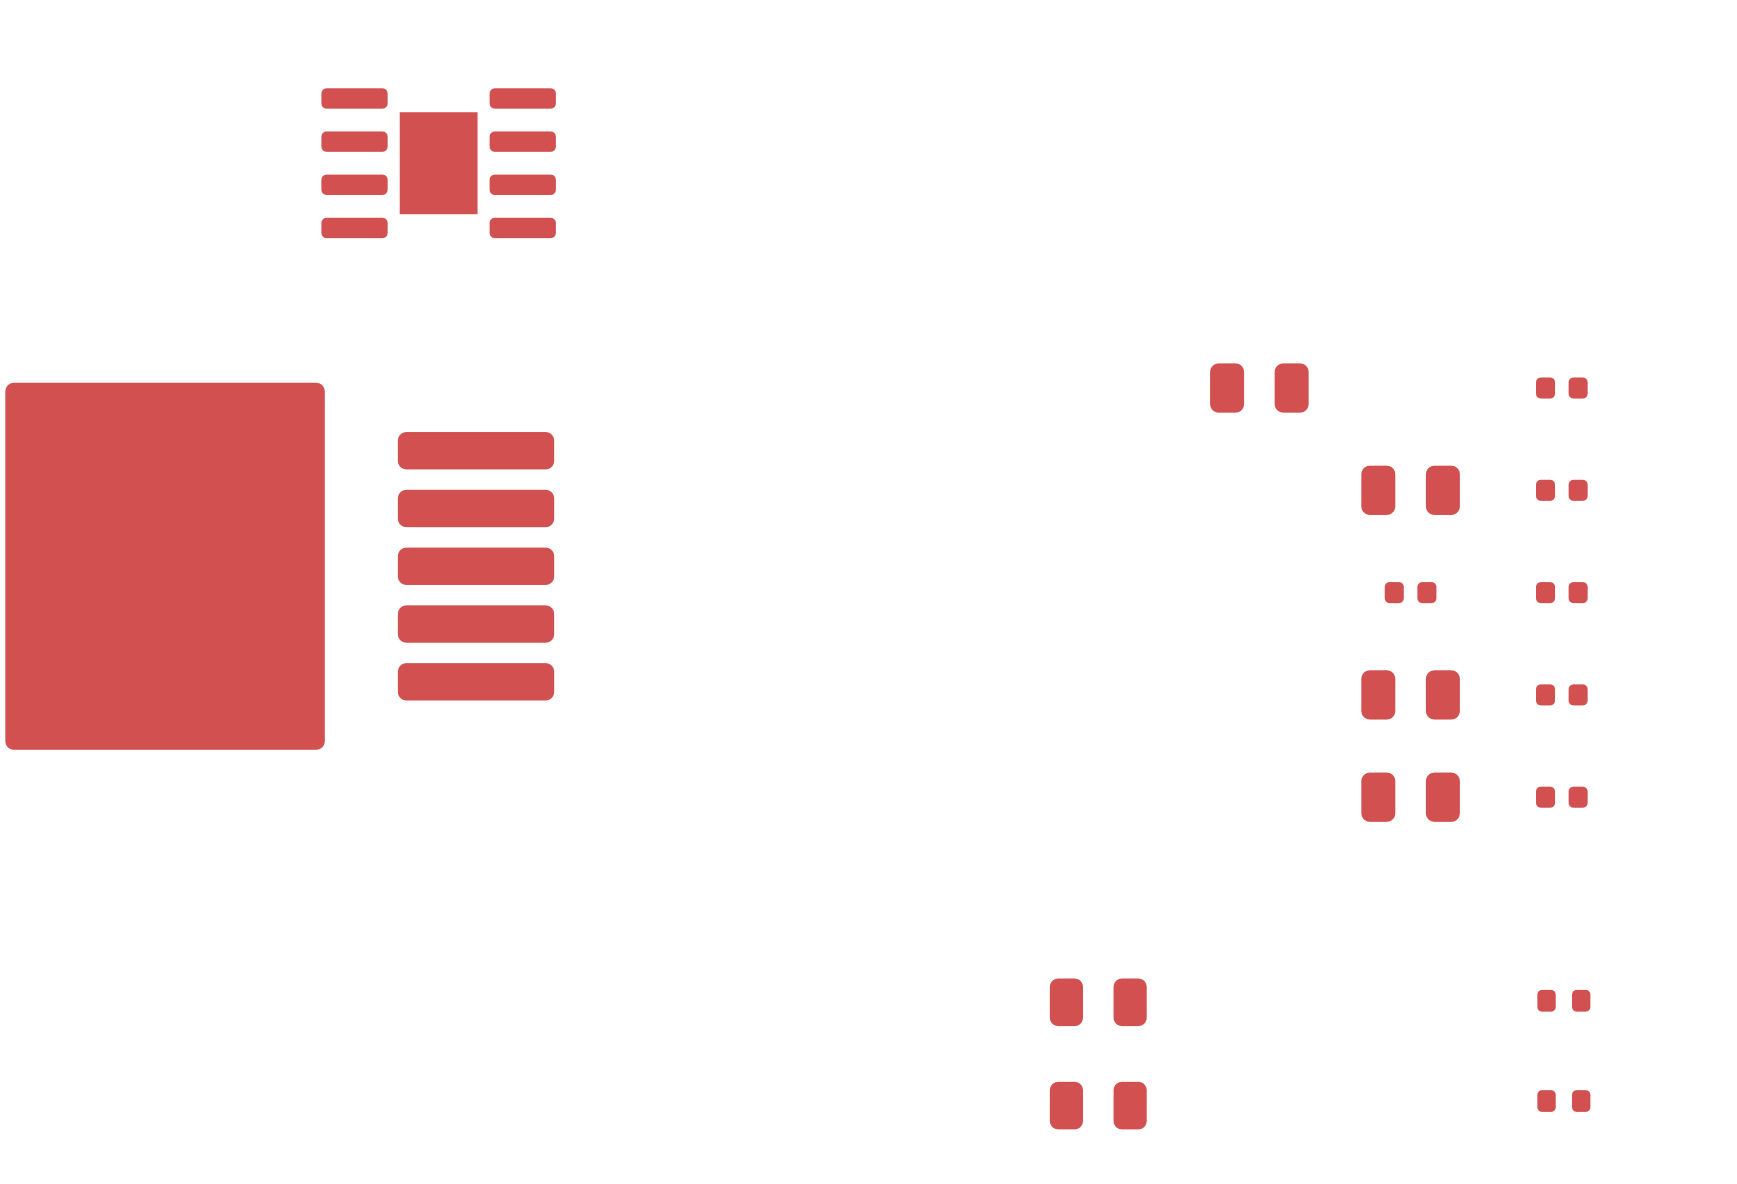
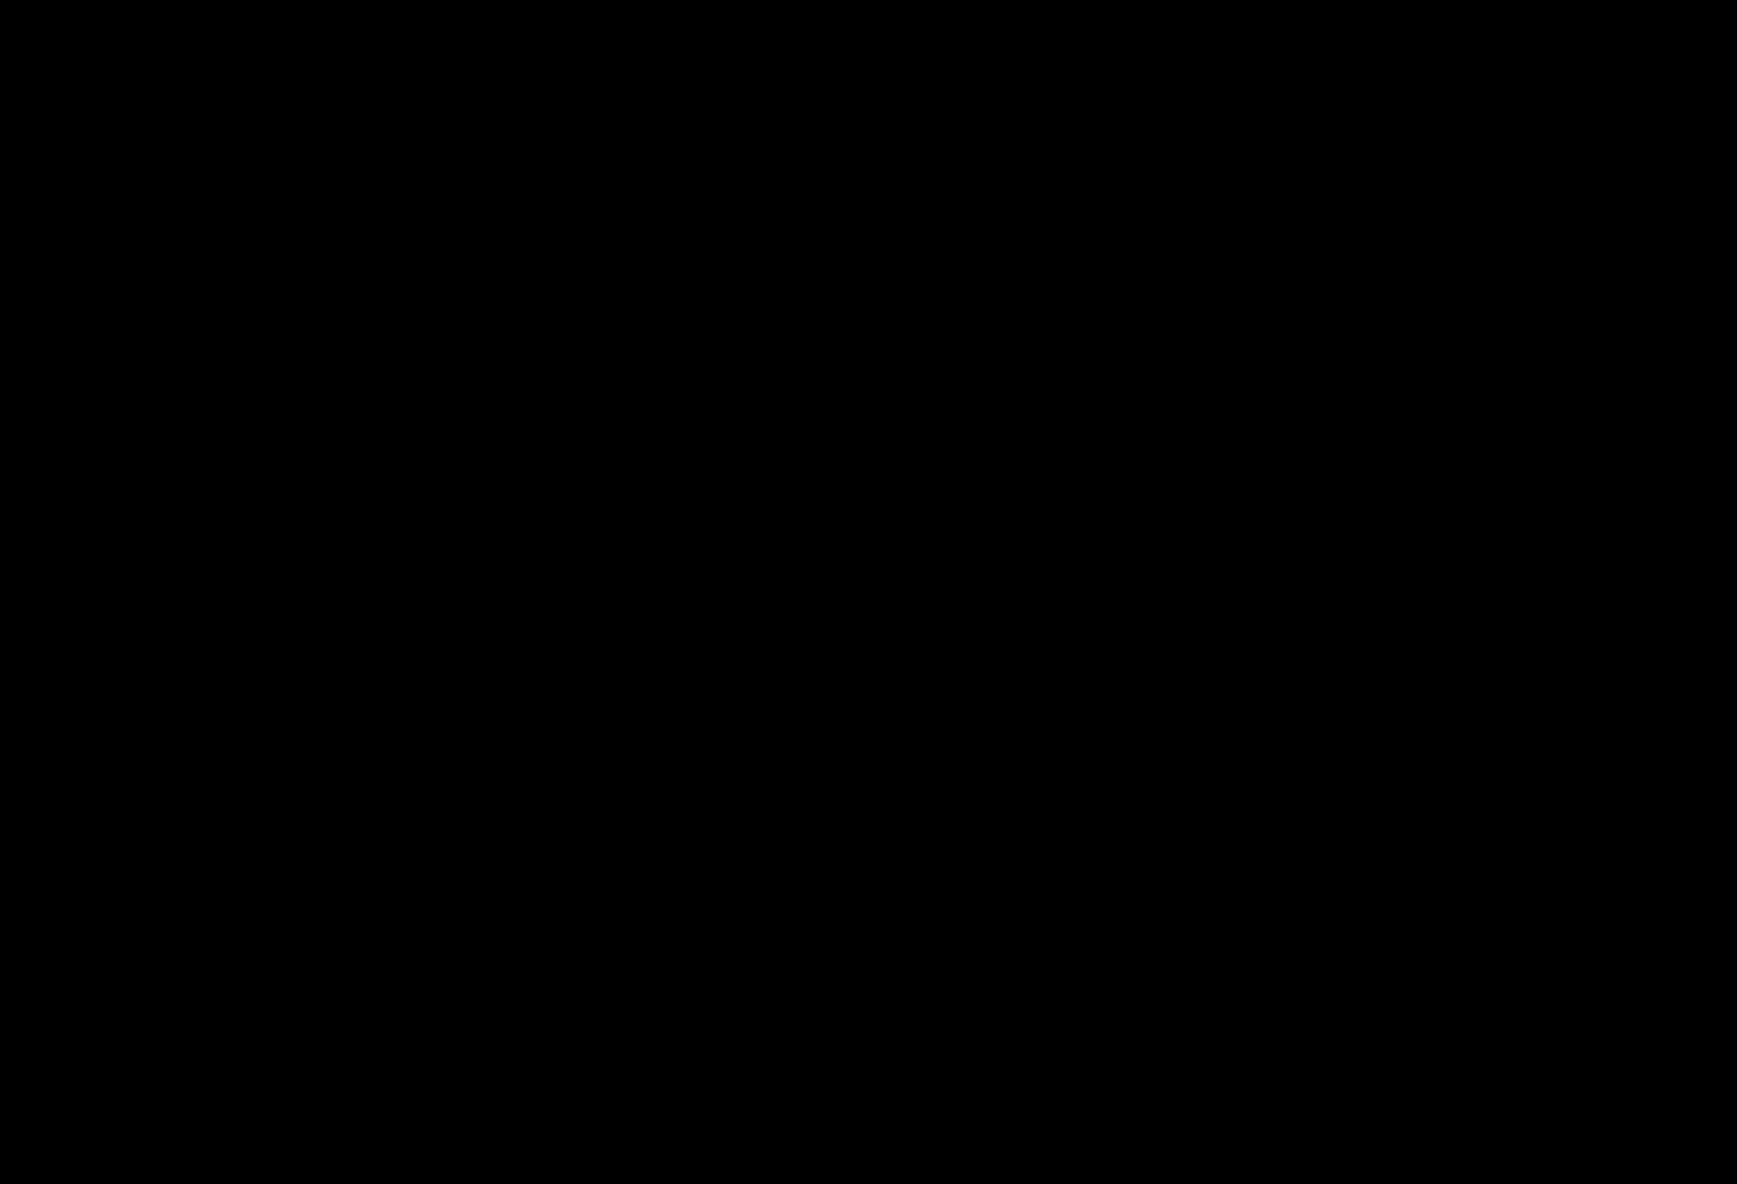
part: (438, 163) -> none
part: (1259, 388) -> none
part: (1561, 388) -> none
part: (1410, 490) -> none
part: (1561, 490) -> none
part: (279, 566) -> none
part: (1410, 592) -> none
part: (1561, 592) -> none
part: (1410, 694) -> none
part: (1561, 694) -> none
part: (1410, 797) -> none
part: (1561, 797) -> none
part: (1563, 1000) -> none
part: (1098, 1002) -> none
part: (1563, 1101) -> none
part: (1098, 1105) -> none

